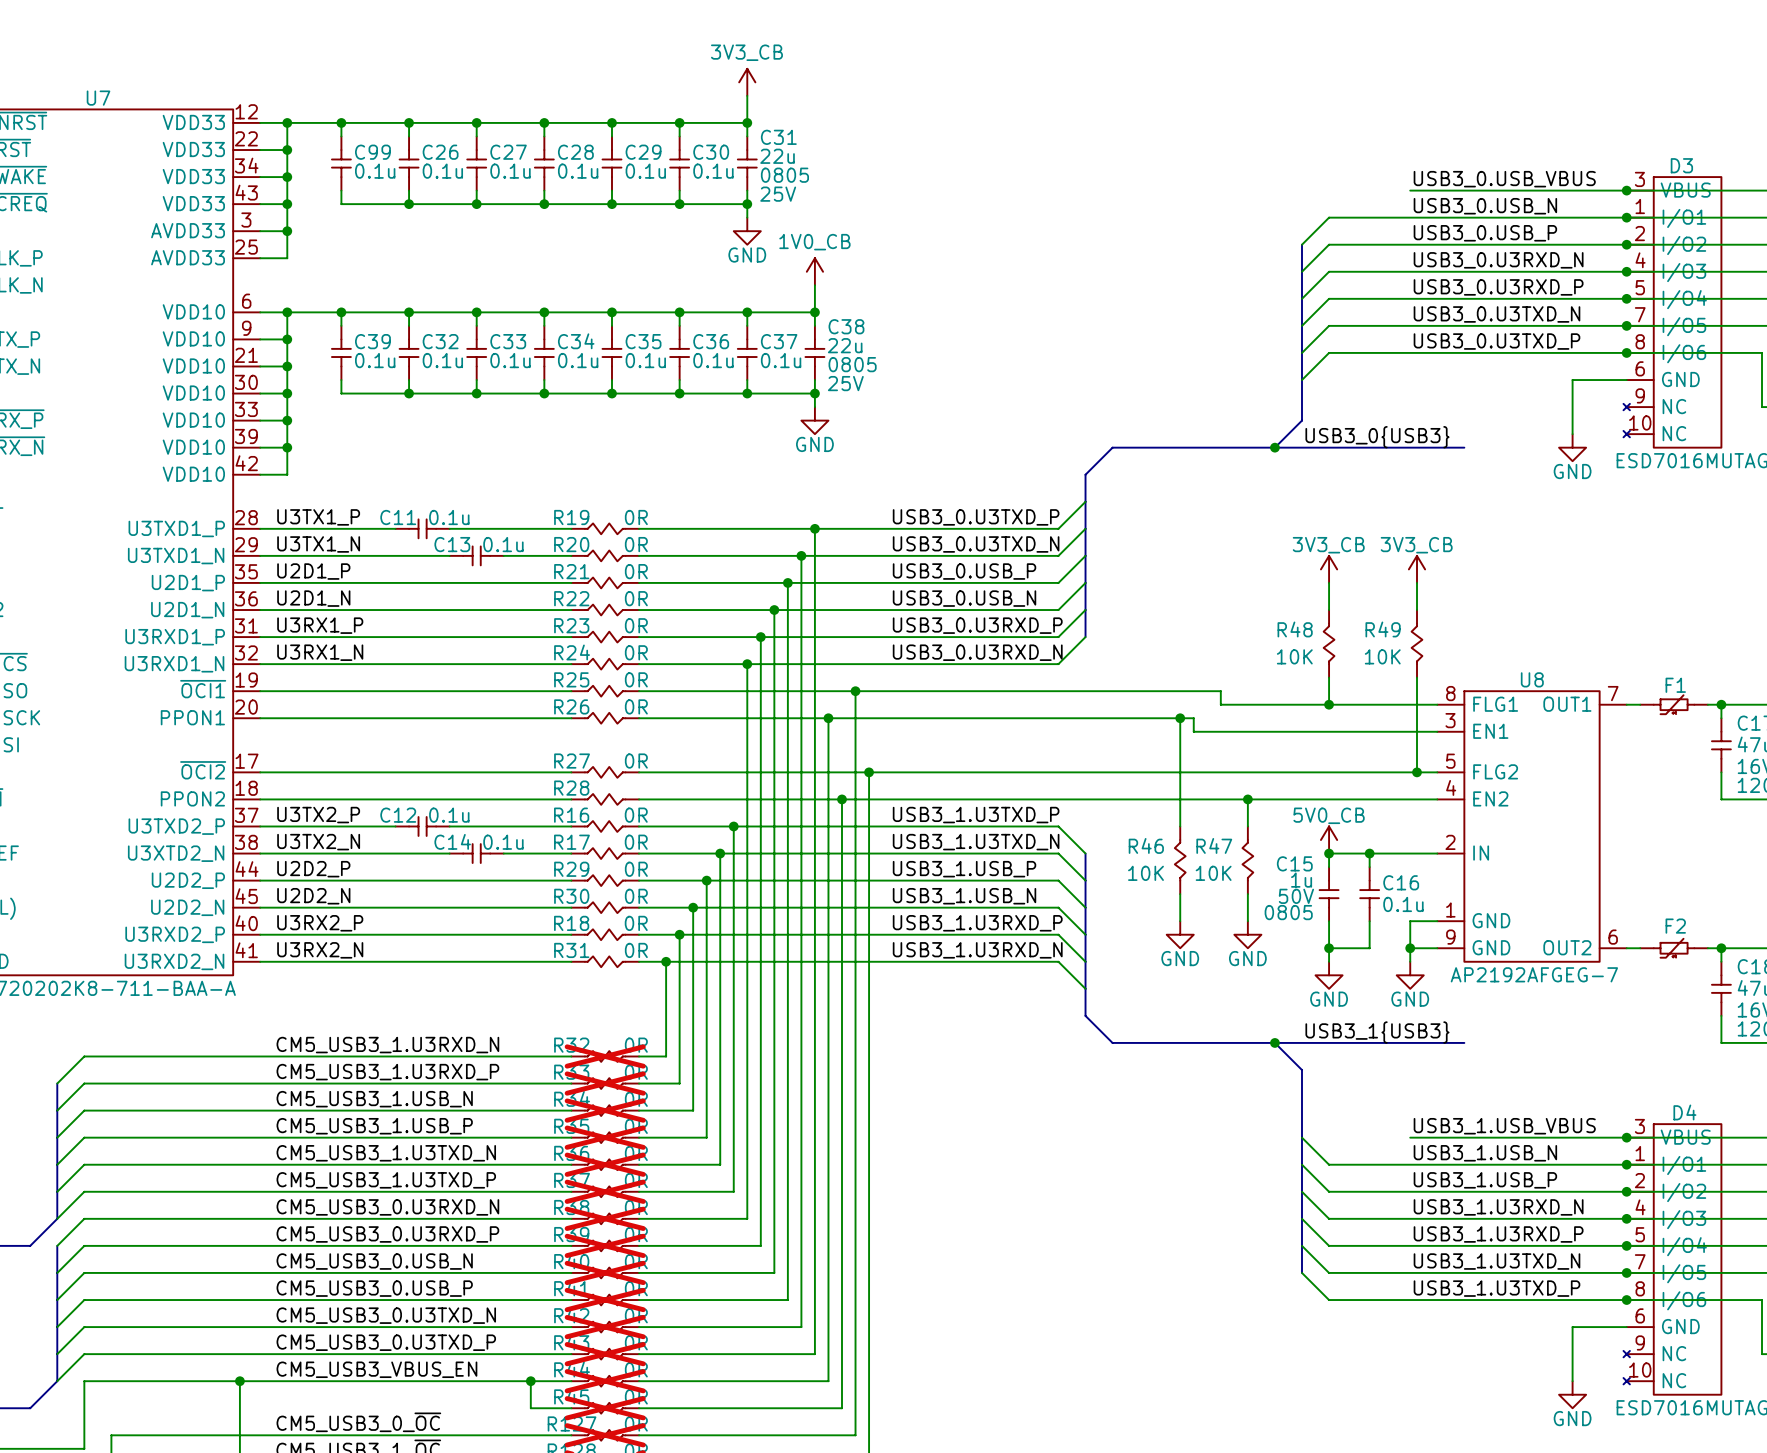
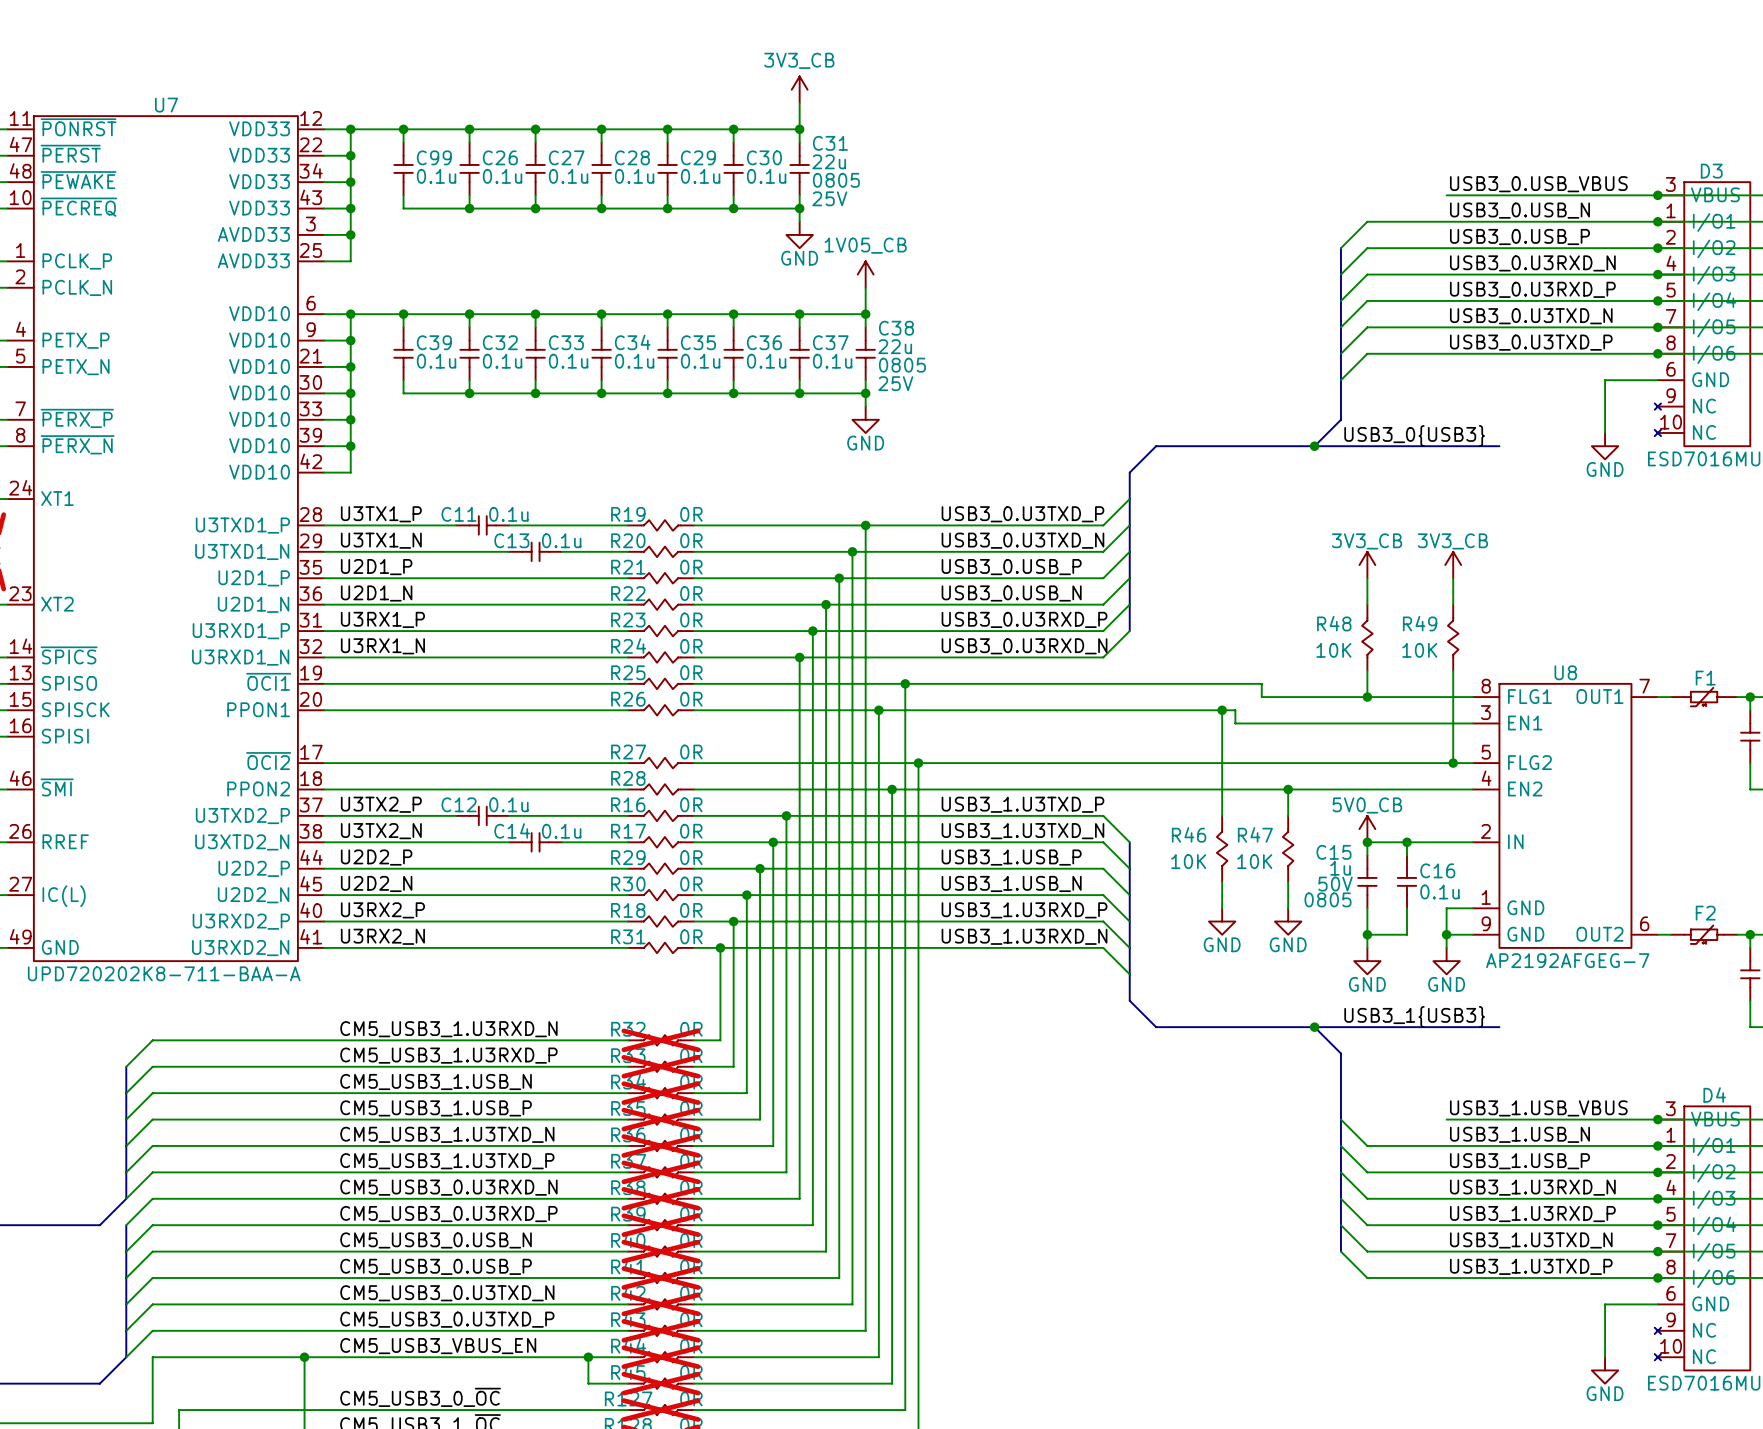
power symbol: 1V0_CB (814, 271) -> 1V05_CB (865, 274)

